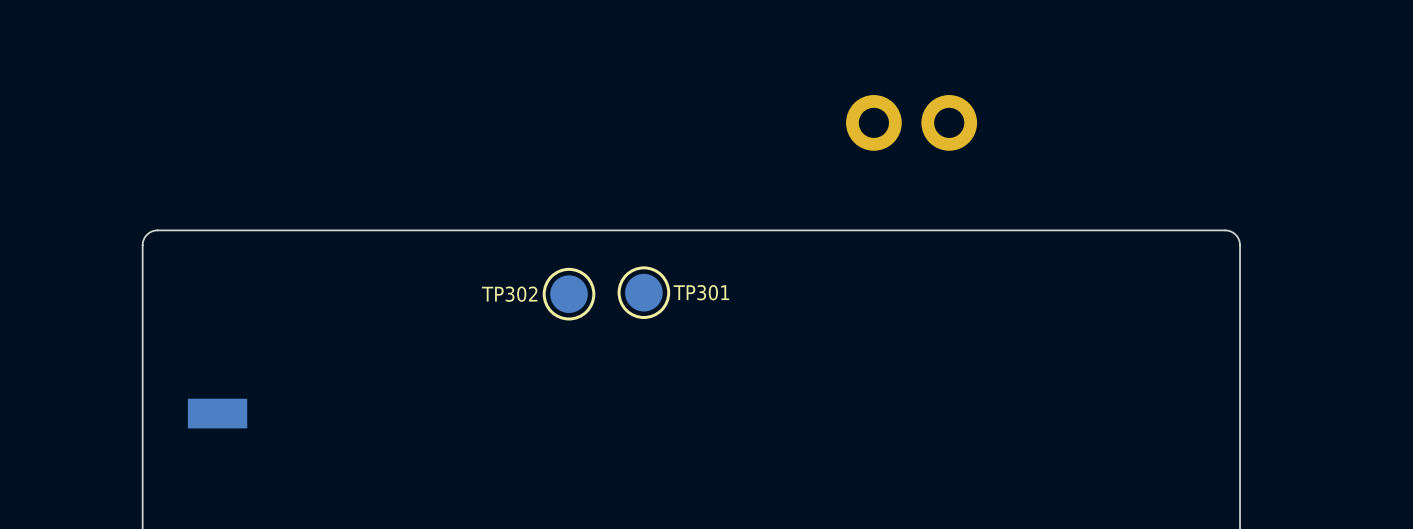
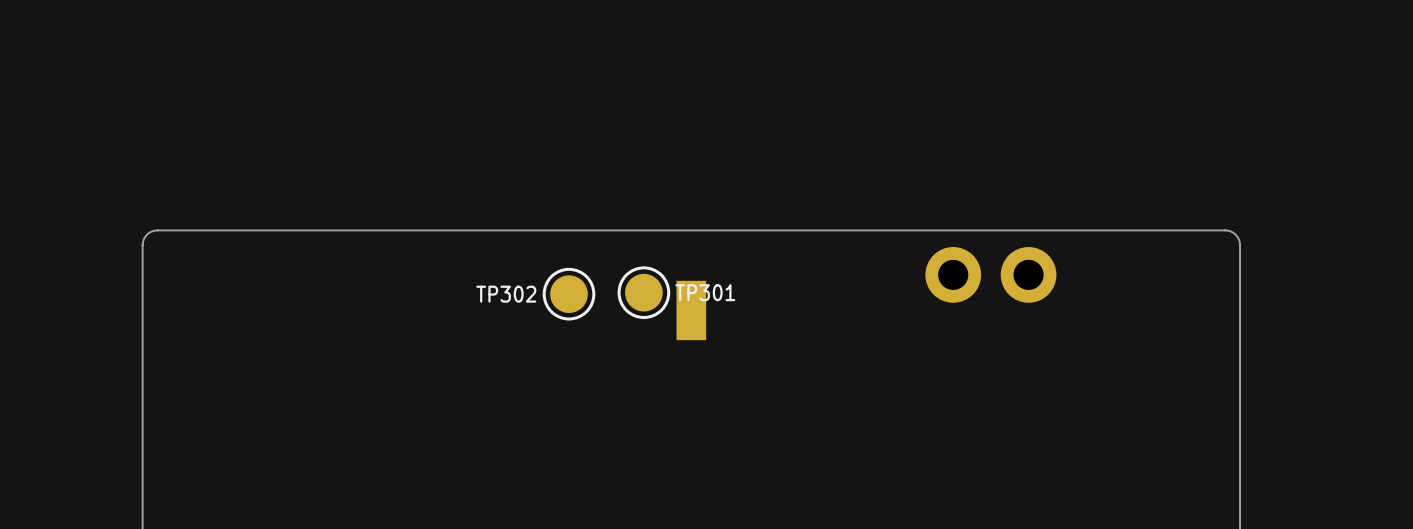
part position: (911, 122) -> (990, 274)
part rotation: 0° (217, 413) -> 90° clockwise (691, 310)
part position: (217, 413) -> (691, 310)

